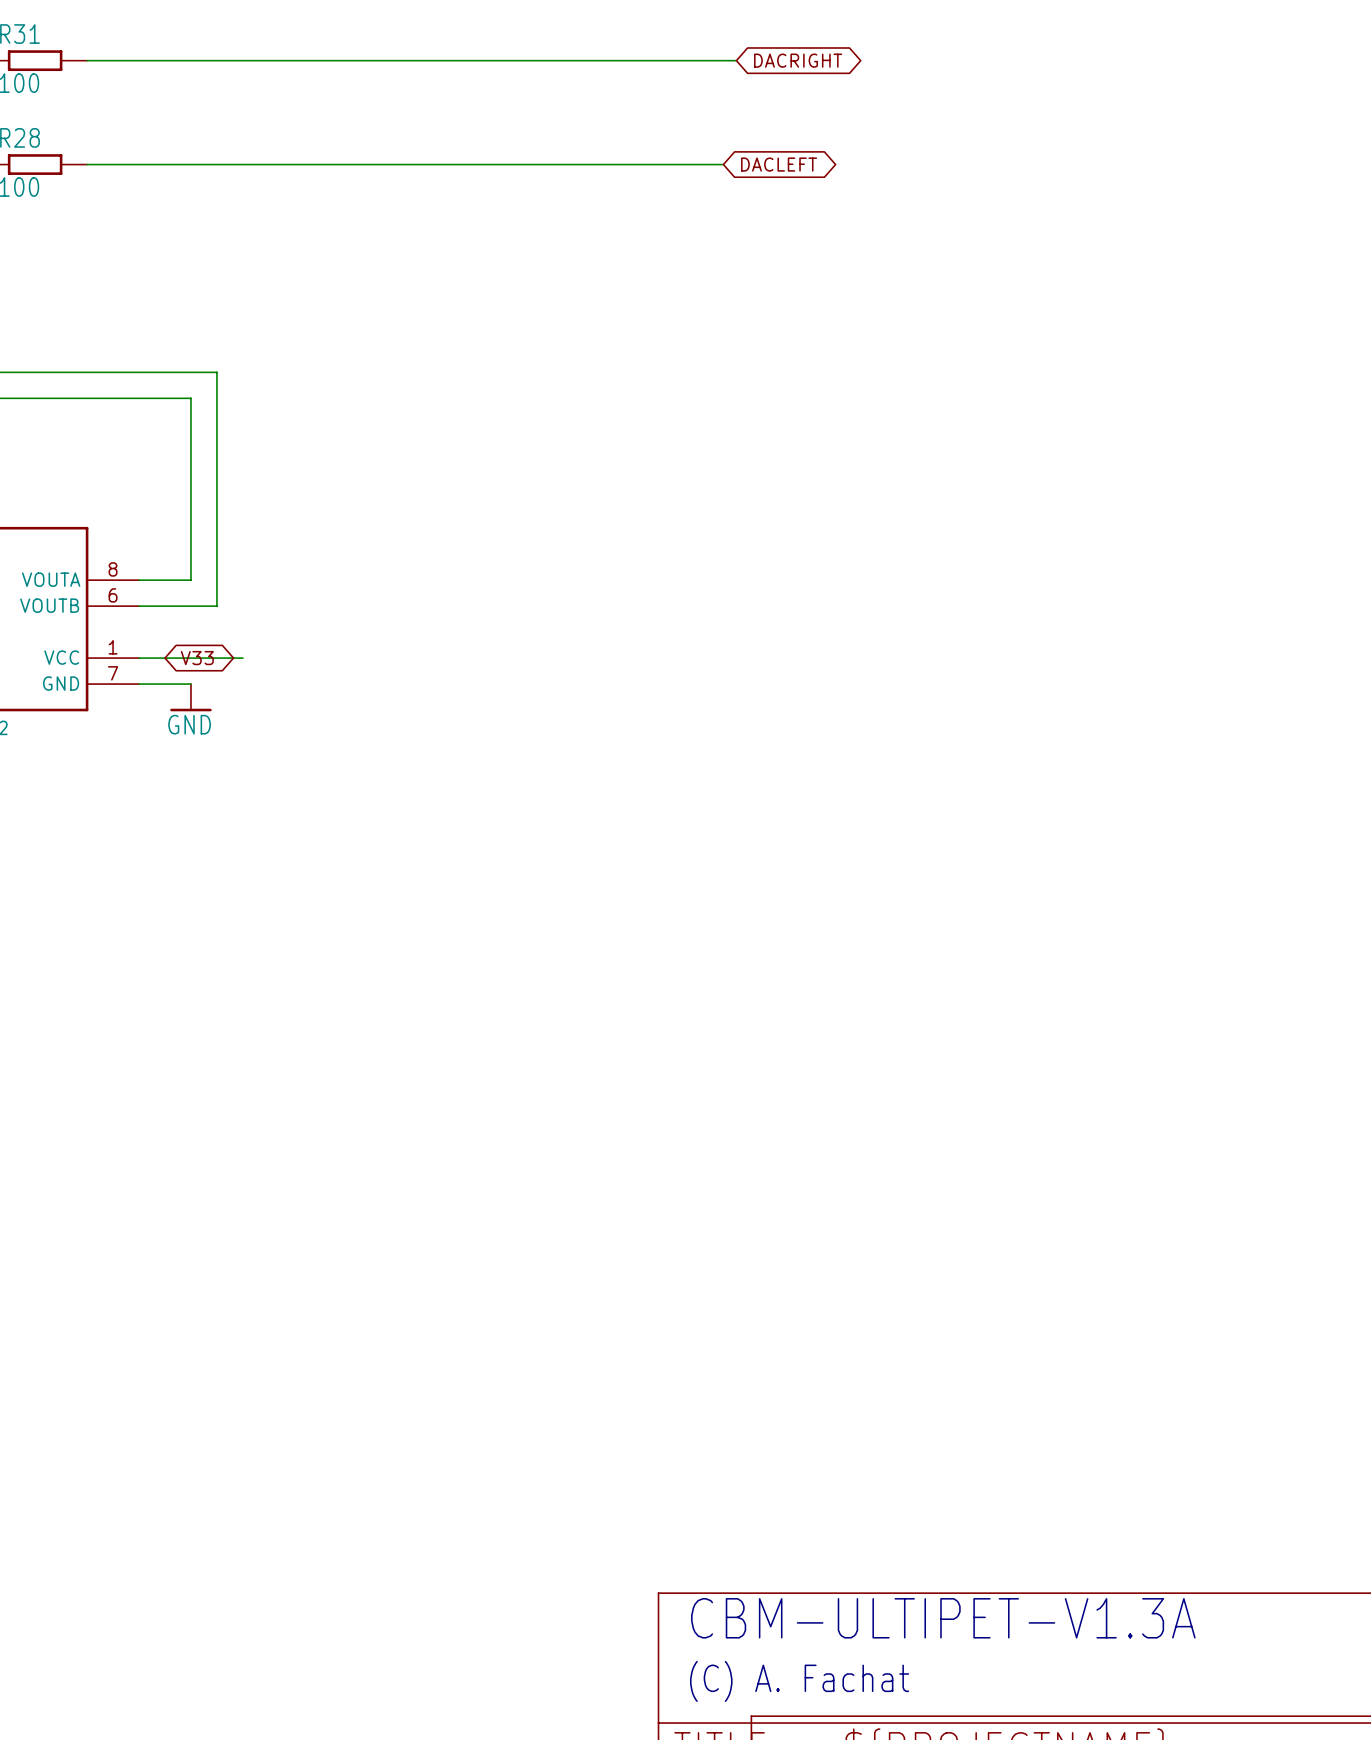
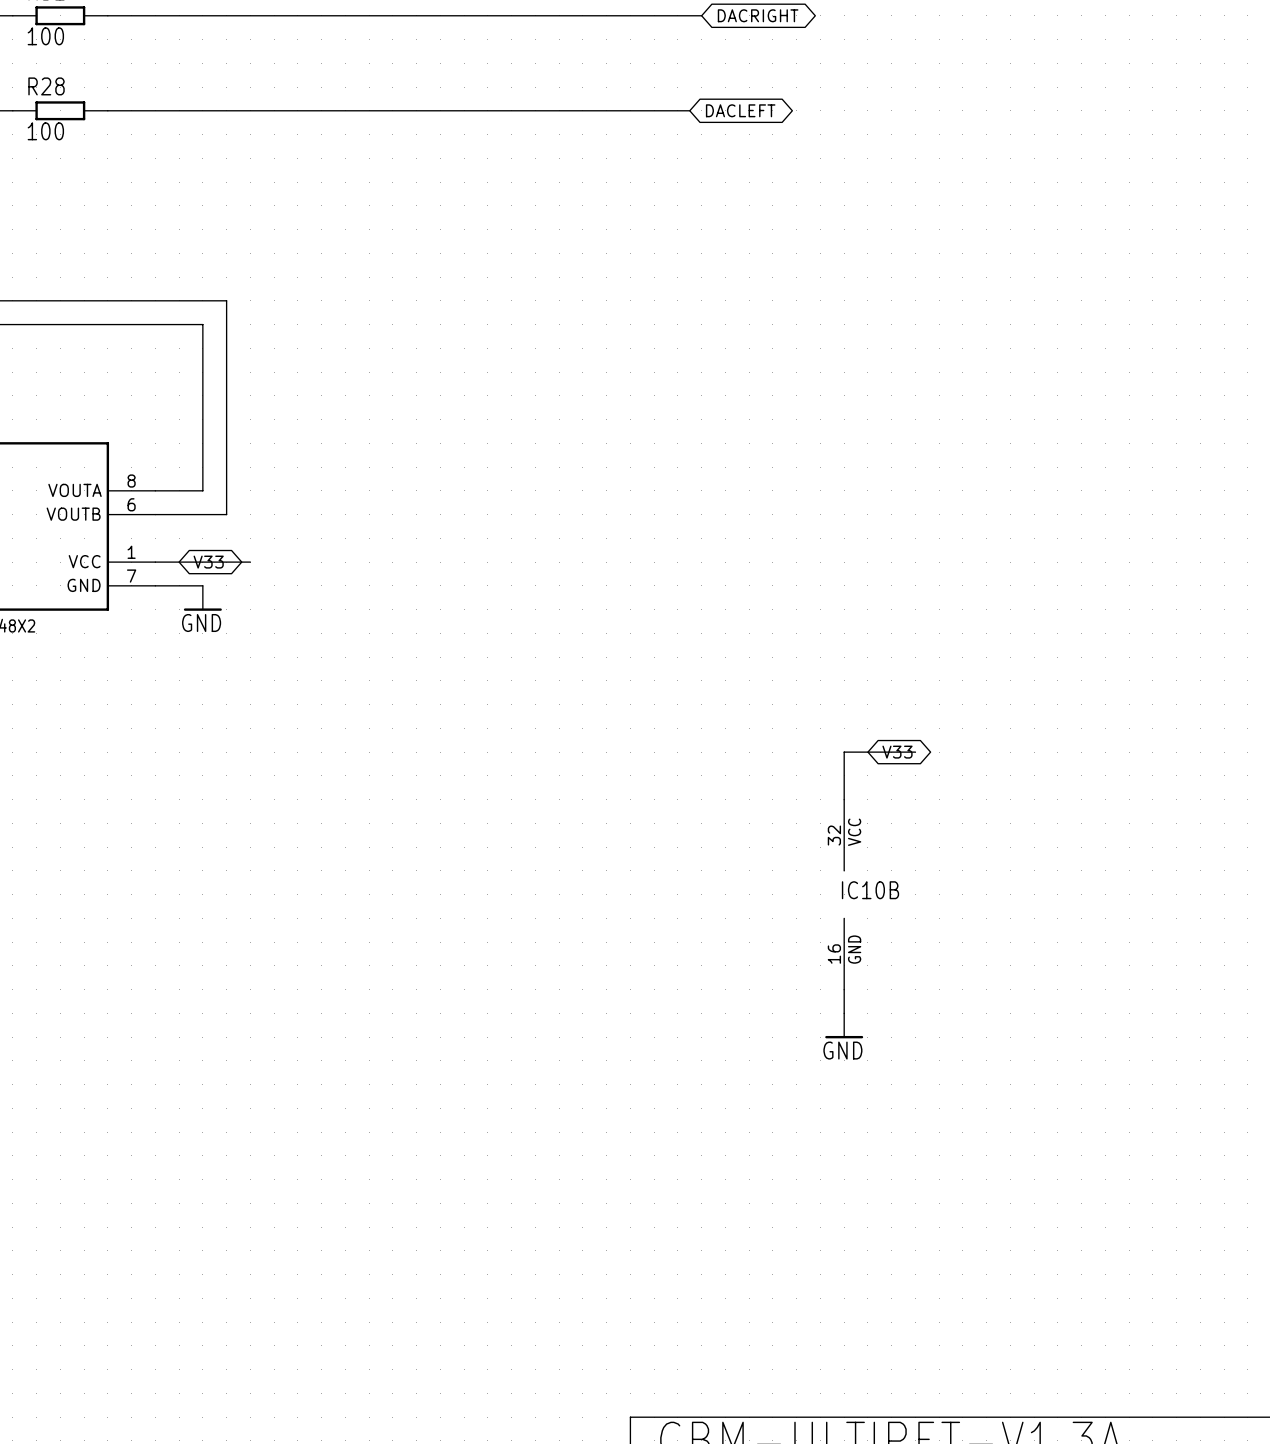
global label: none -> V33 (897, 752)
wire: none -> (915, 752) (844, 752) (844, 799)
IC10B: none -> (844, 894)
wire: none -> (844, 989) (844, 1013)
power symbol: none -> GND (844, 1025)

